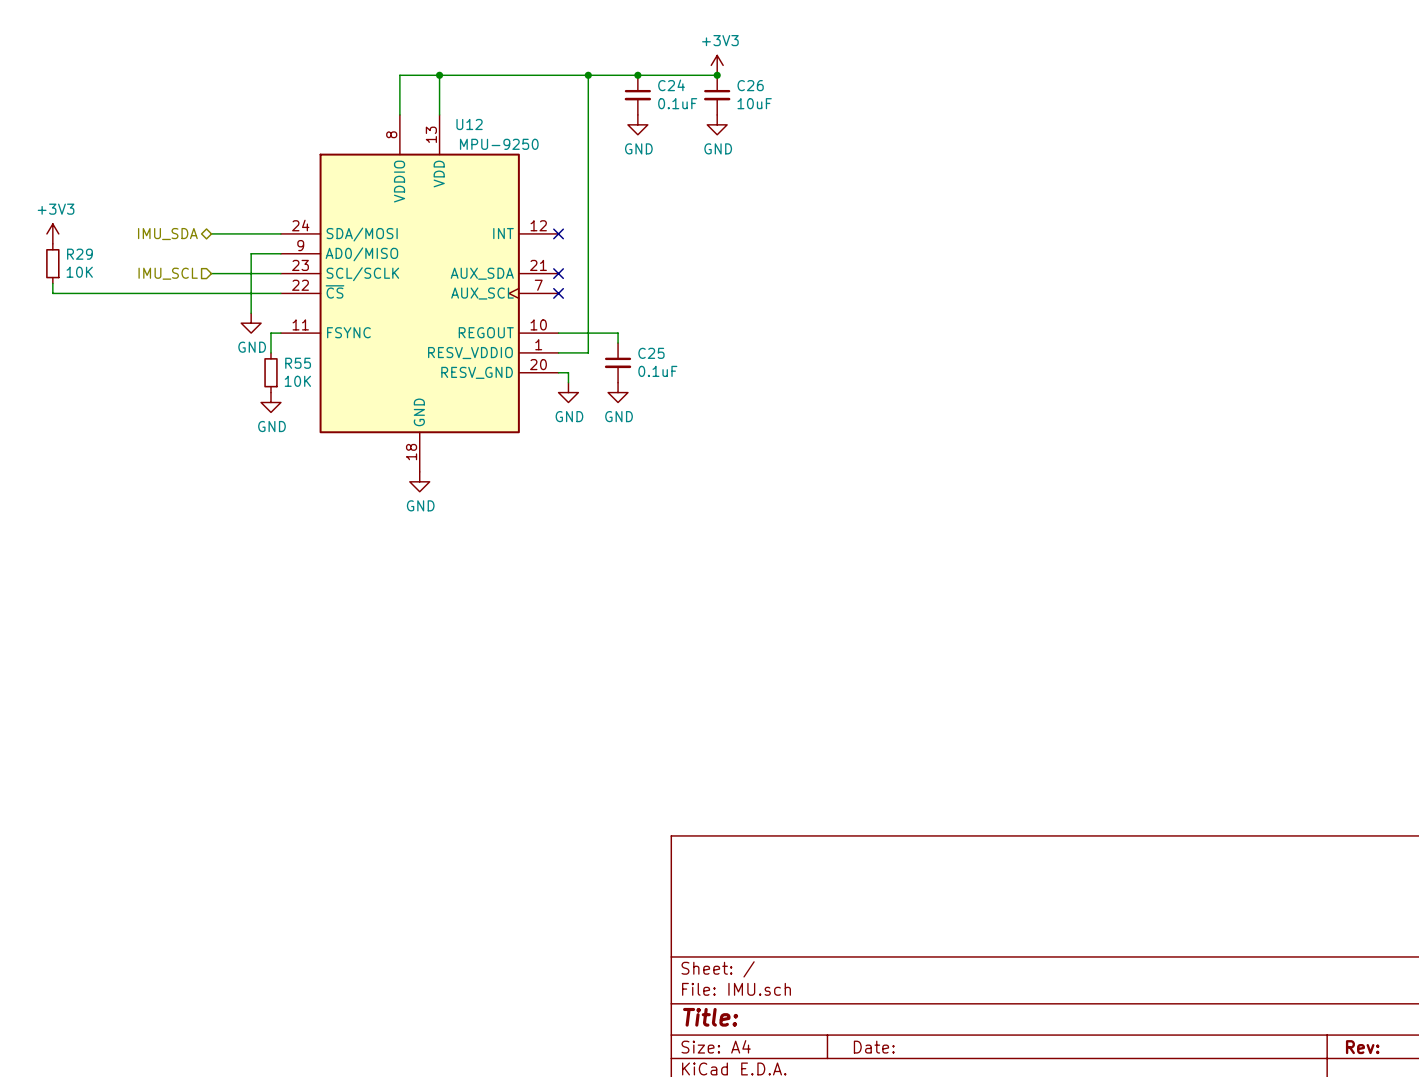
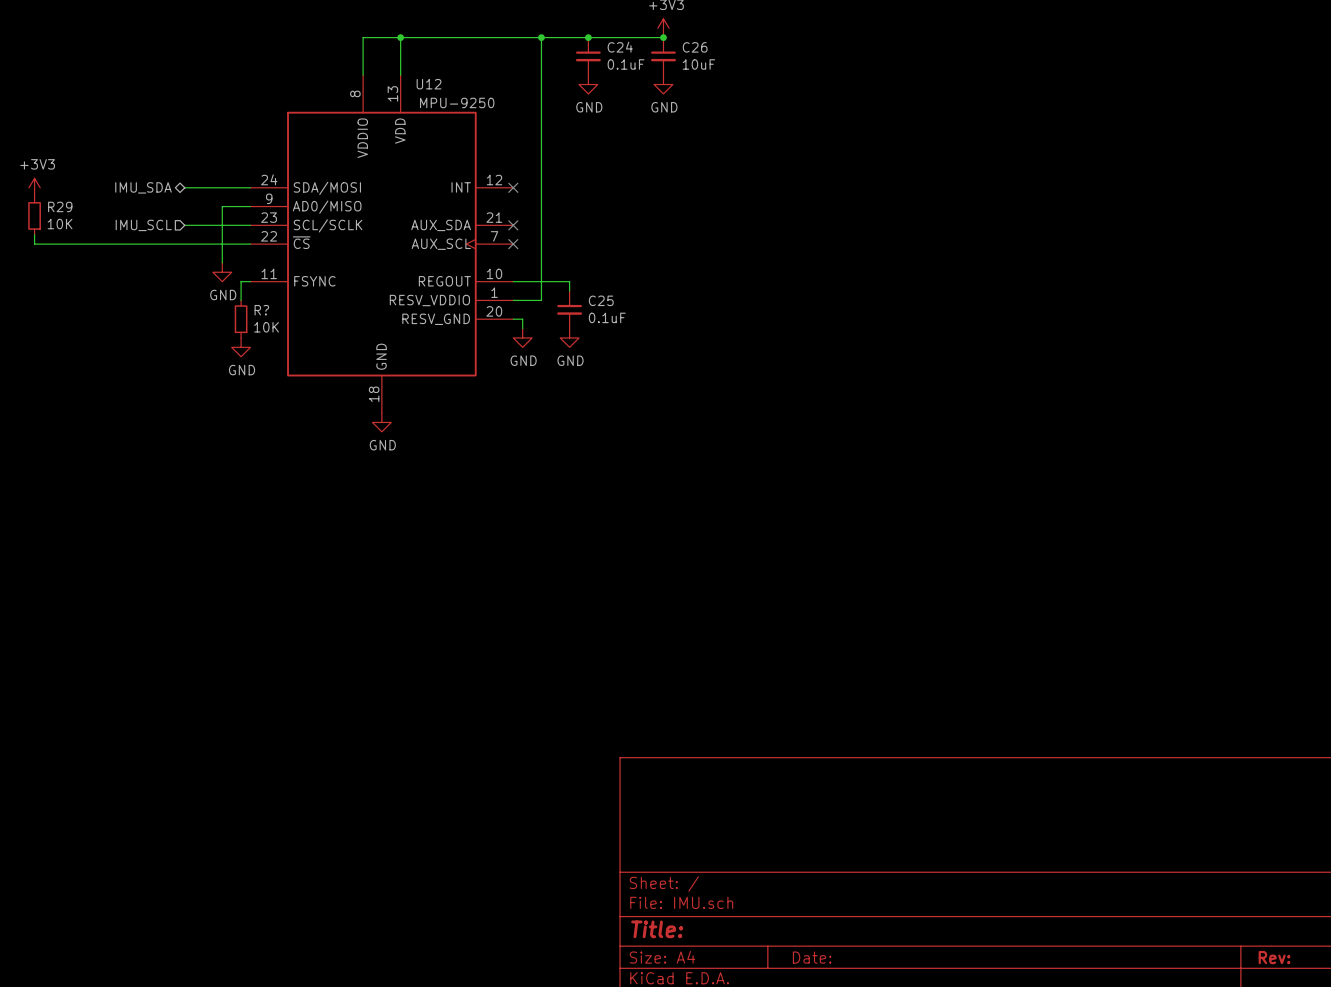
R55 name: R55 (298, 363) -> R? (261, 310)

